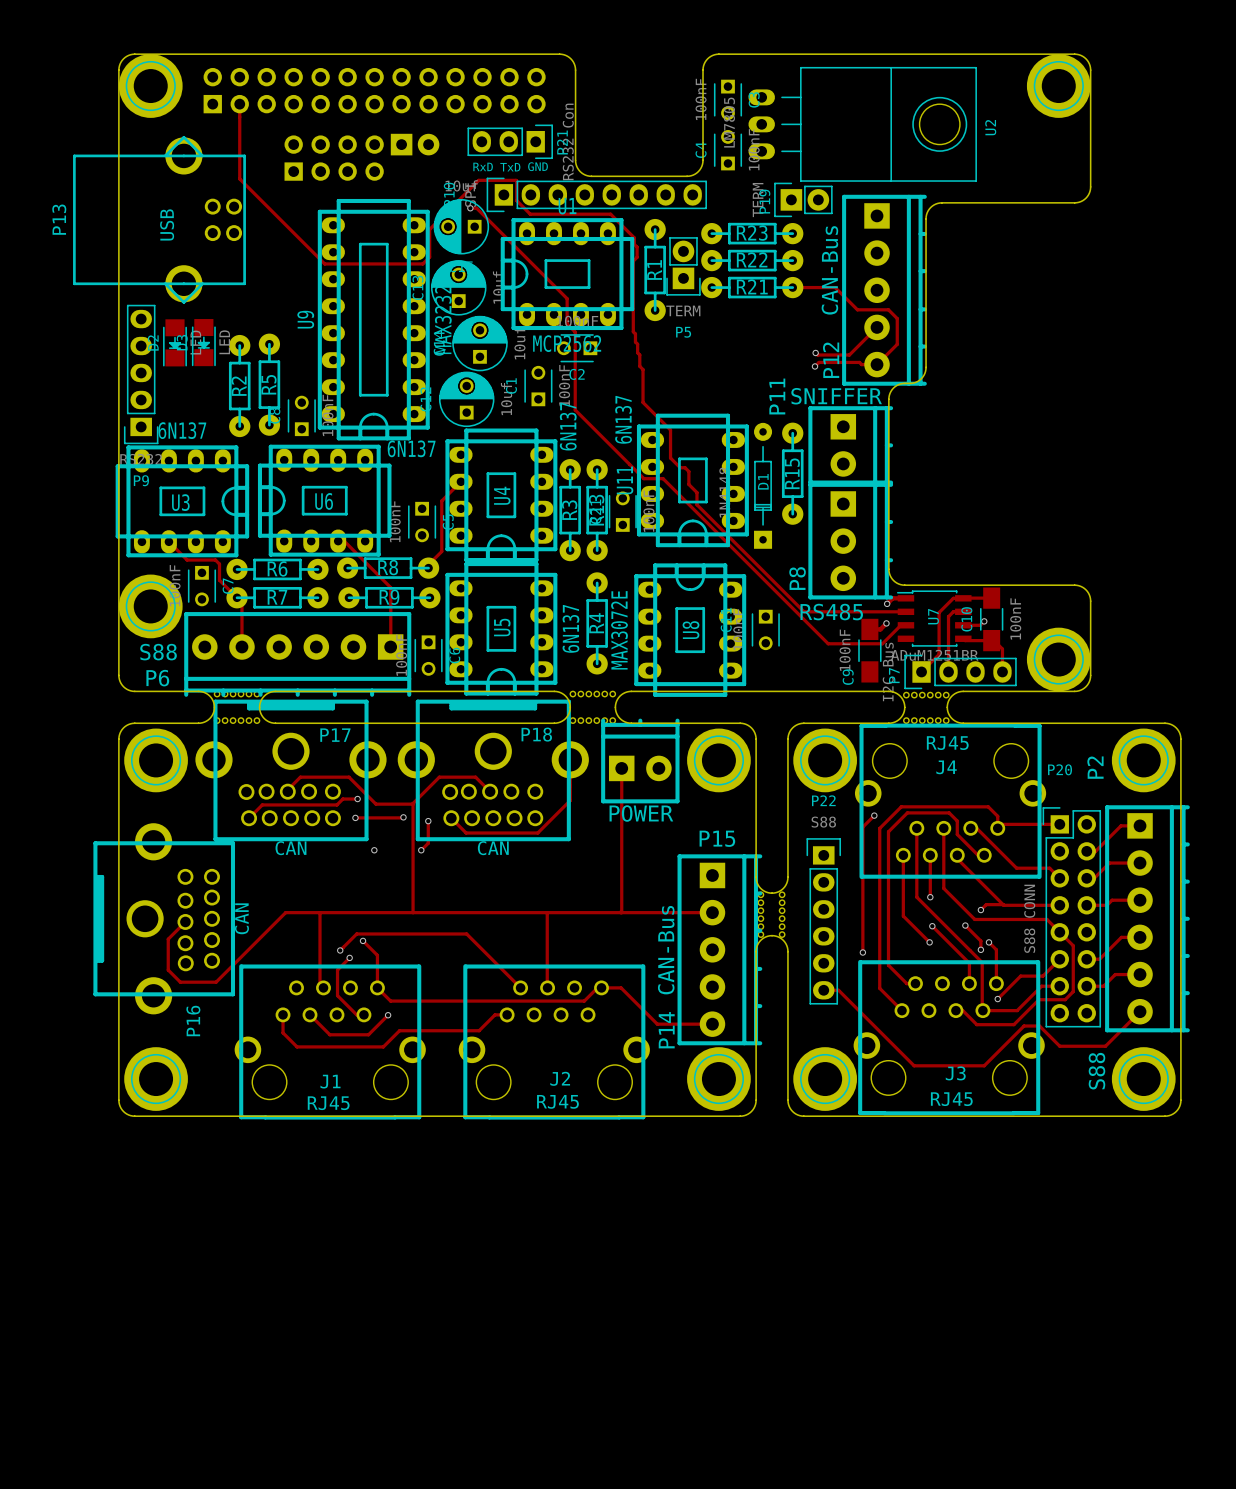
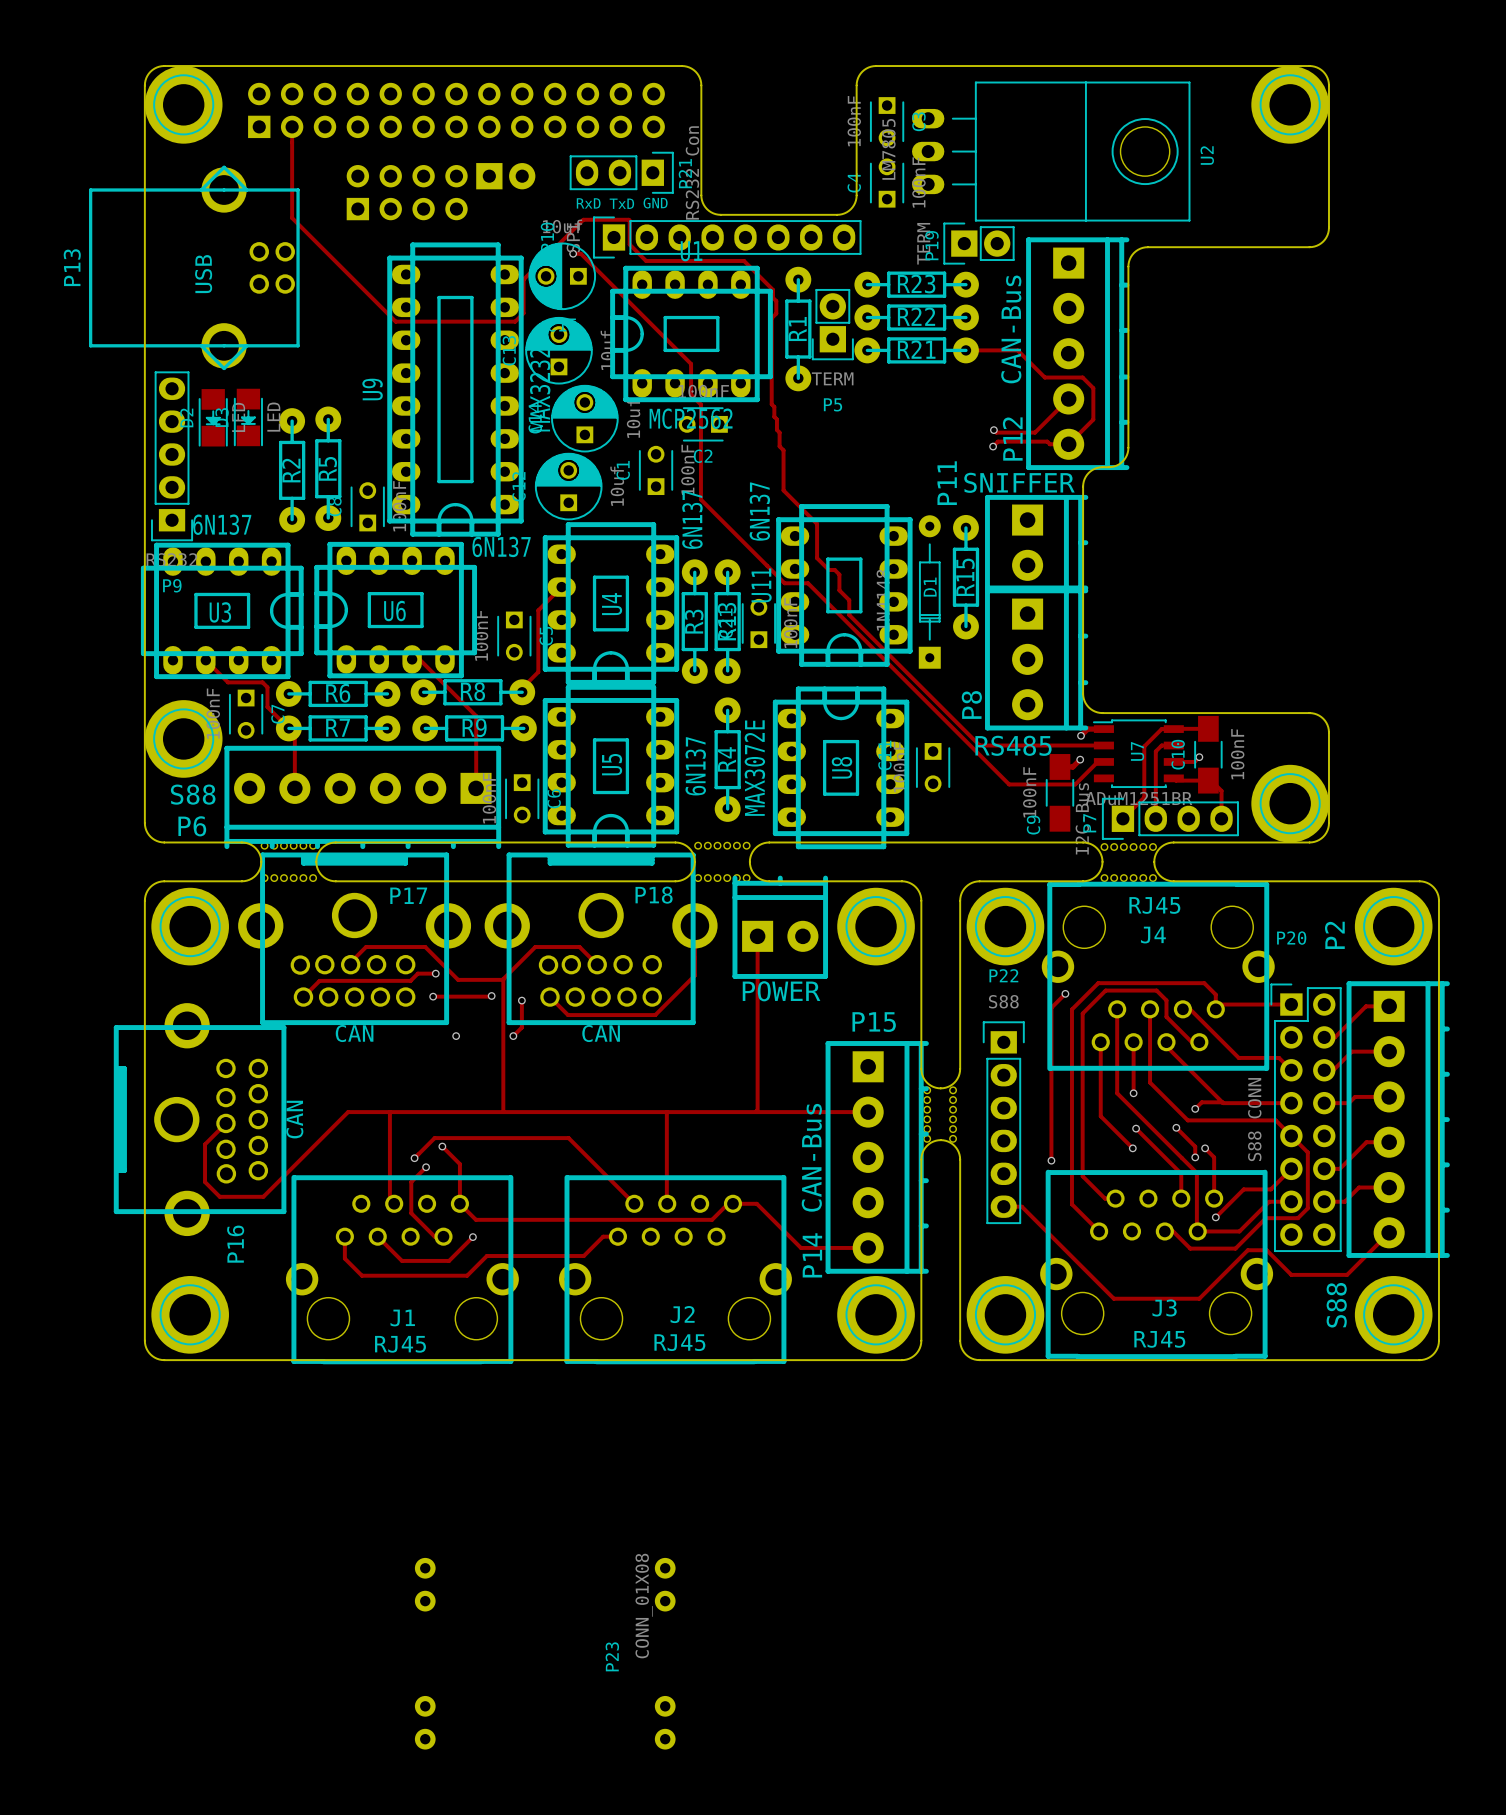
P23: none -> CONN_01X08 (545, 1653)

